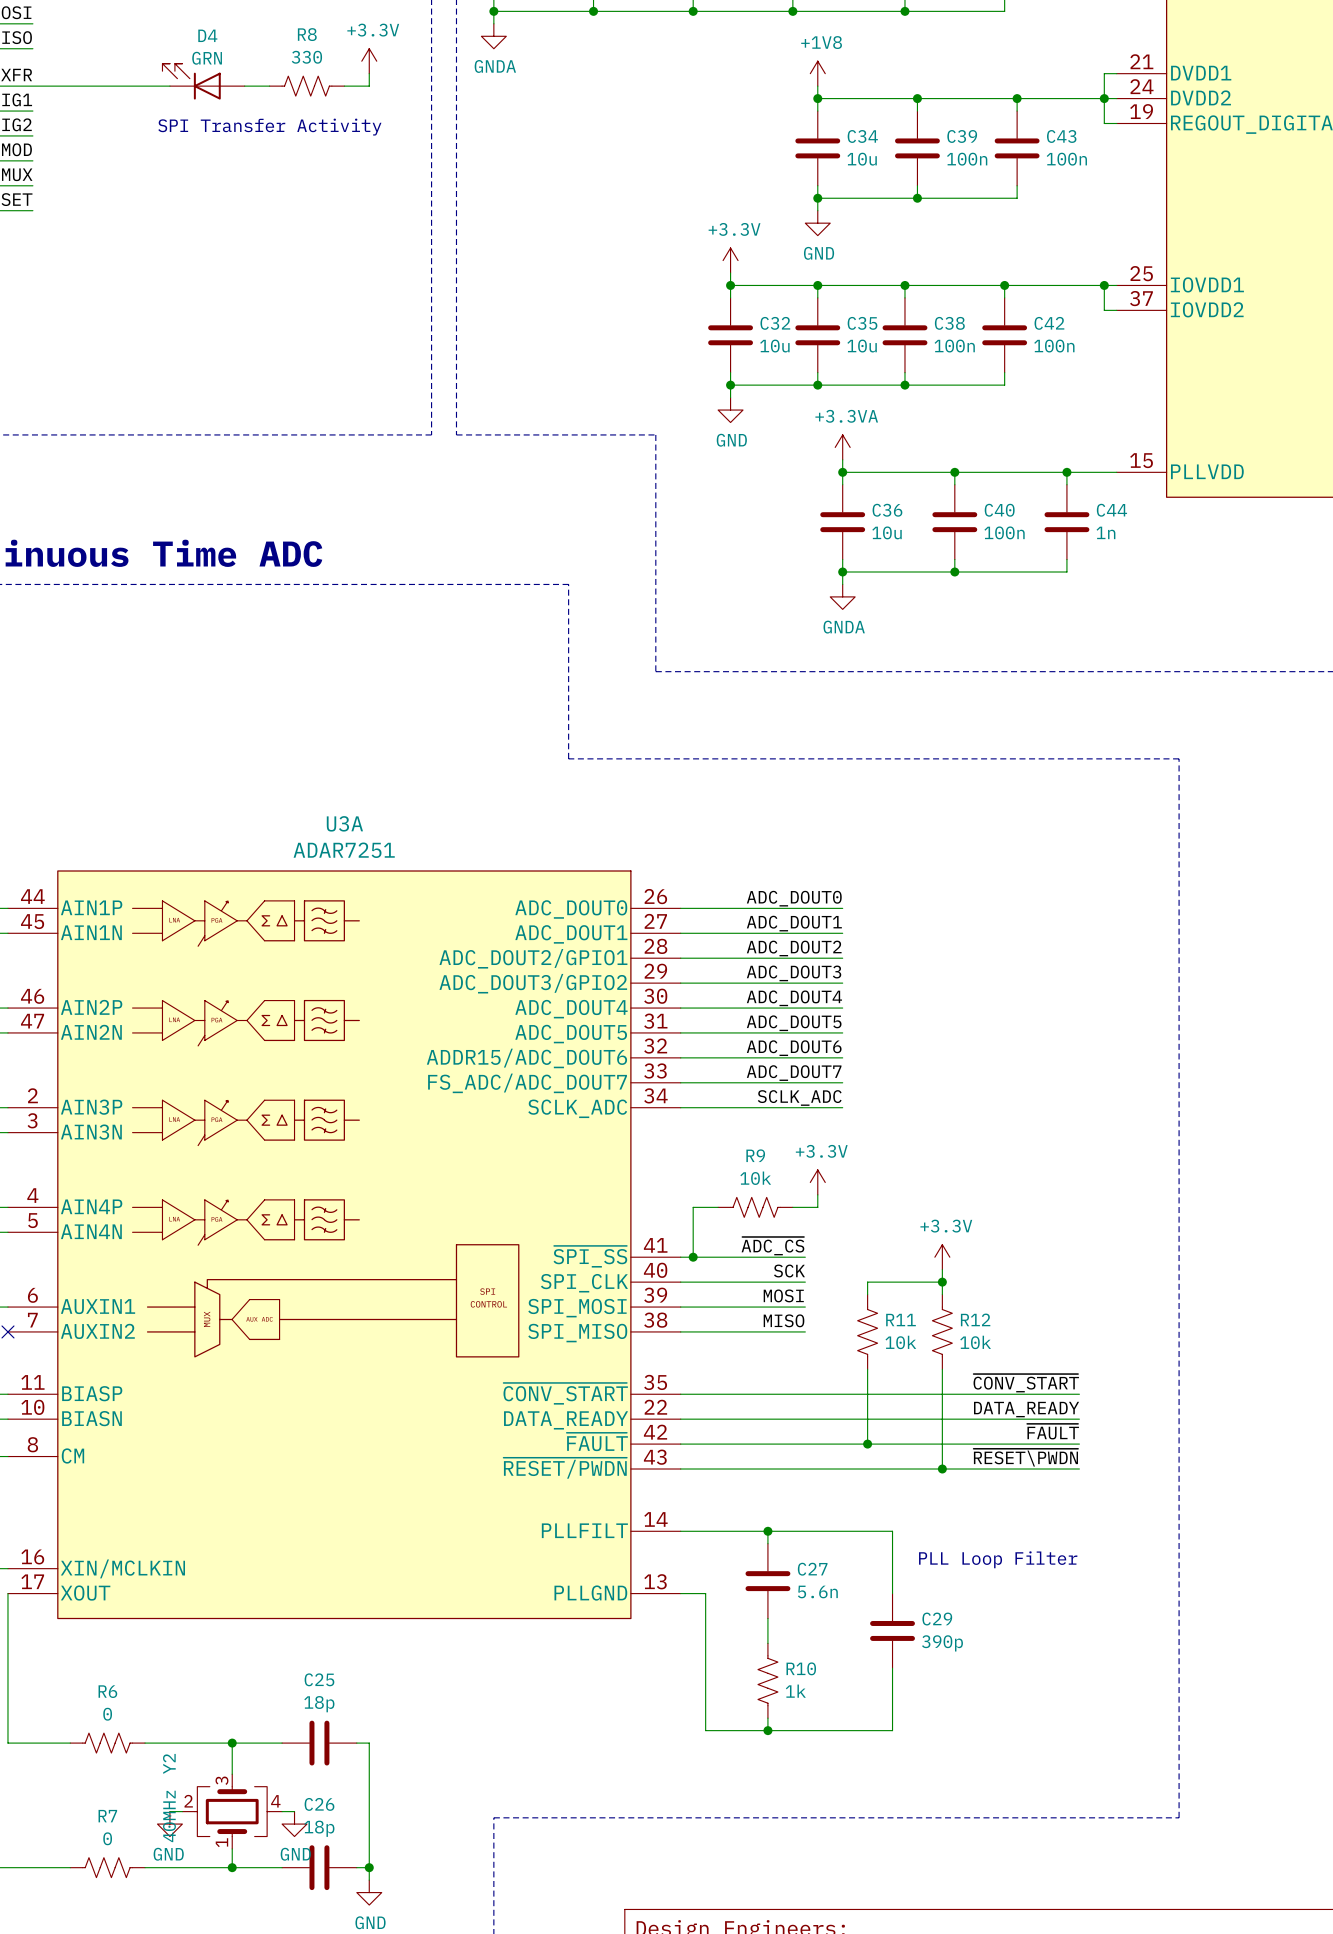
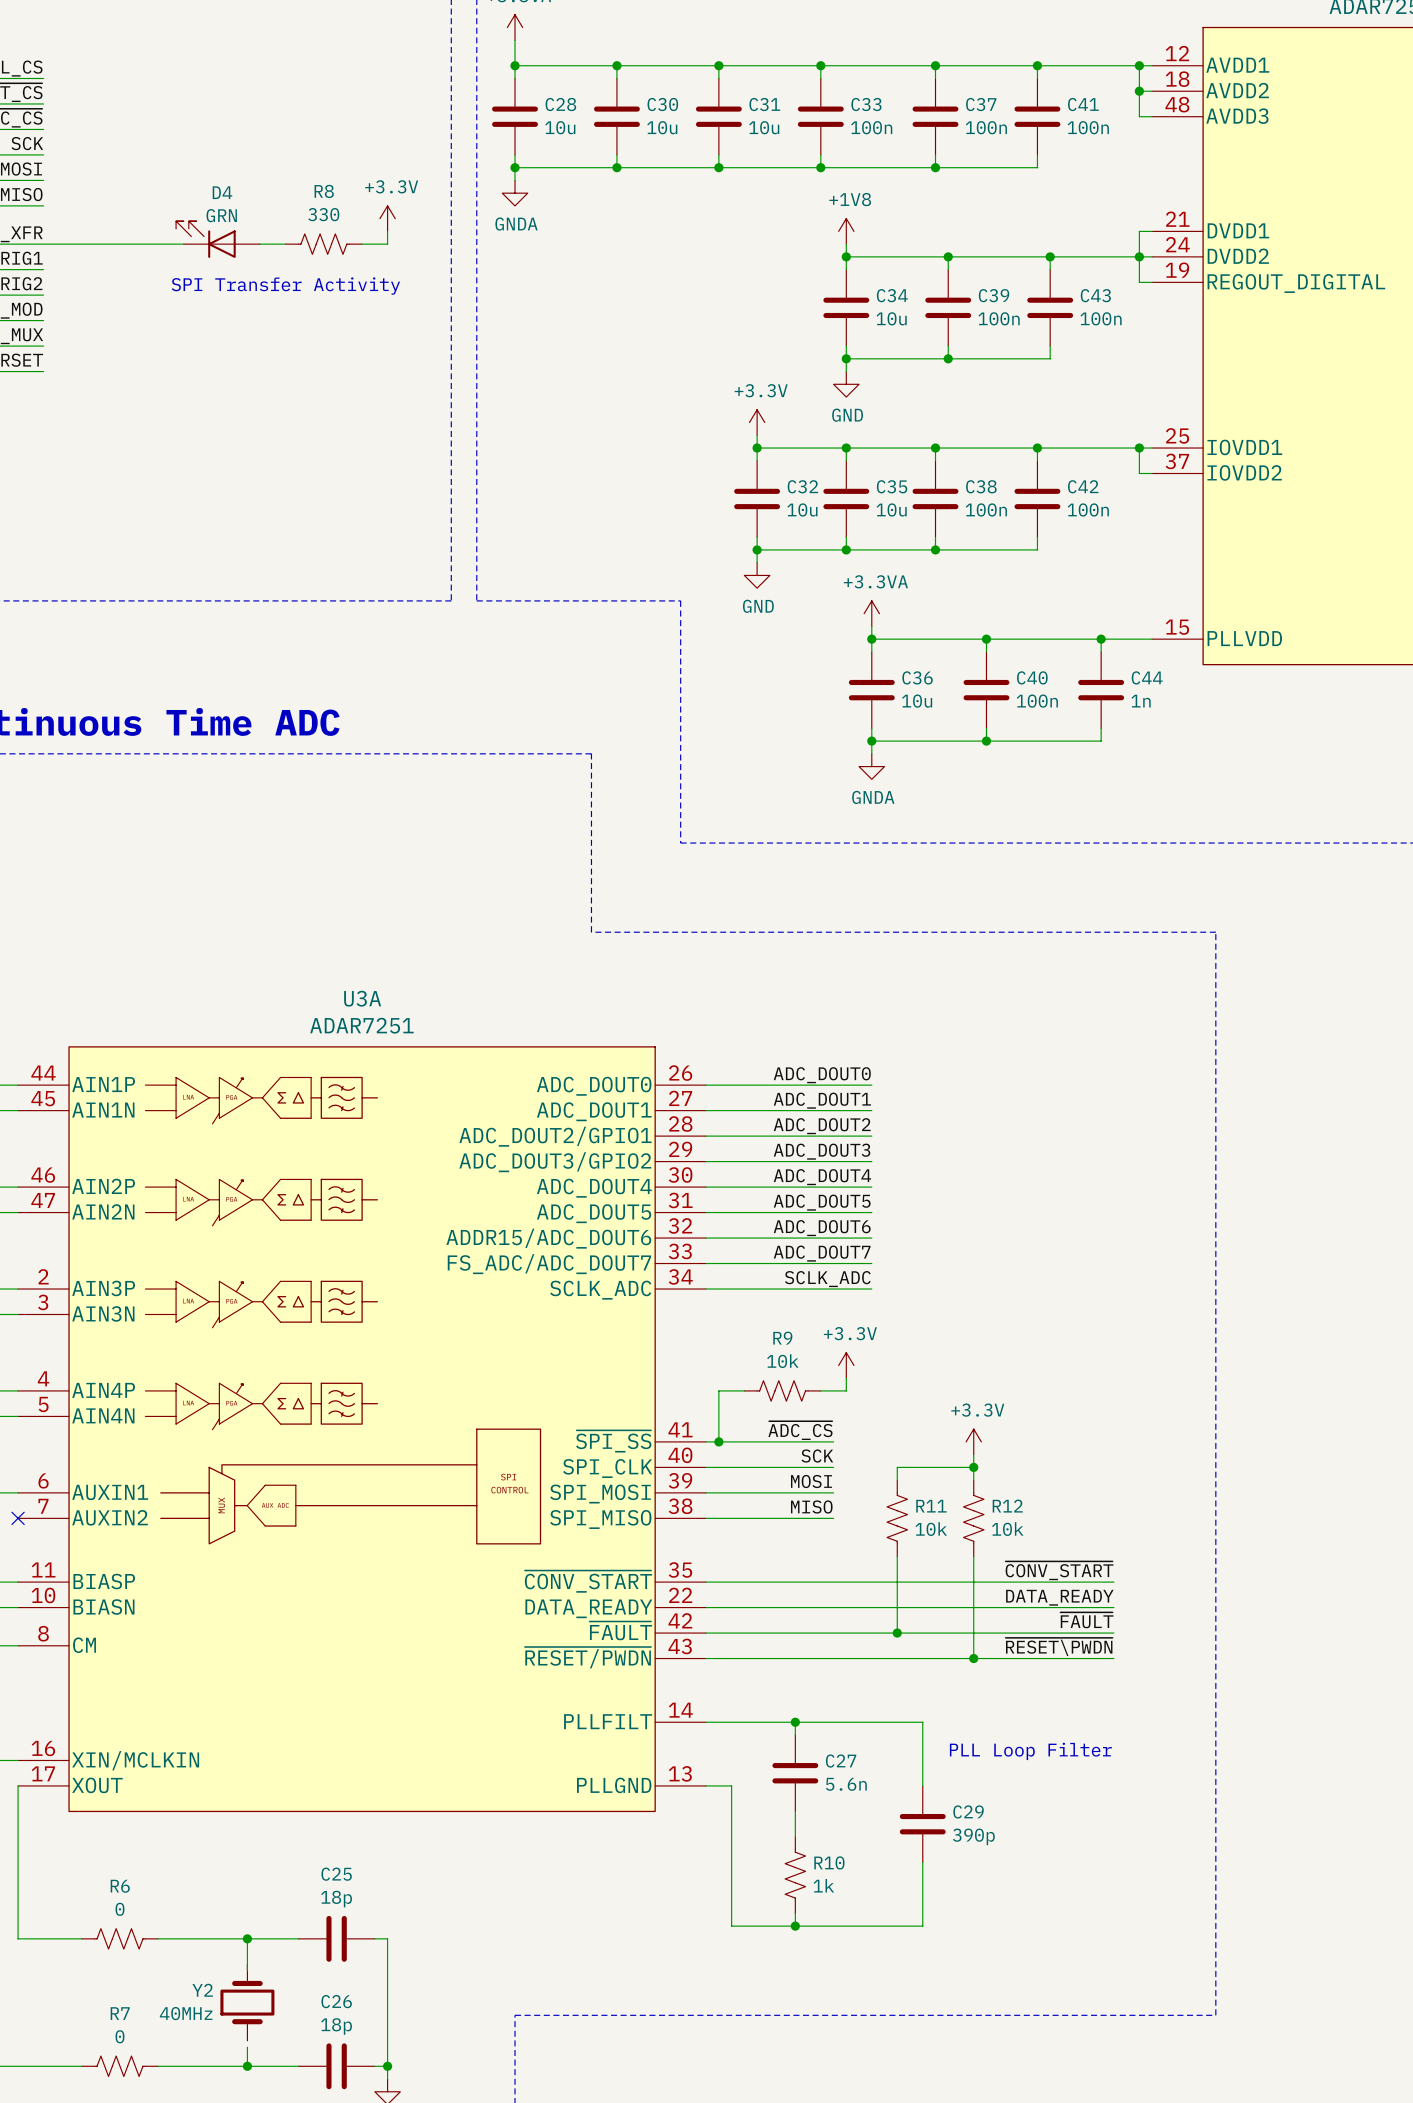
Y2 name position: Y2 (169, 1763) -> Y2 (202, 1990)
Y2 symbol: [182, 1774, 283, 1849] -> [220, 1964, 275, 2041]
wire: (169, 1811) (182, 1811) -> none
wire: (282, 1811) (294, 1811) -> none
power symbol: GND (169, 1824) -> none
power symbol: GND (294, 1824) -> none

